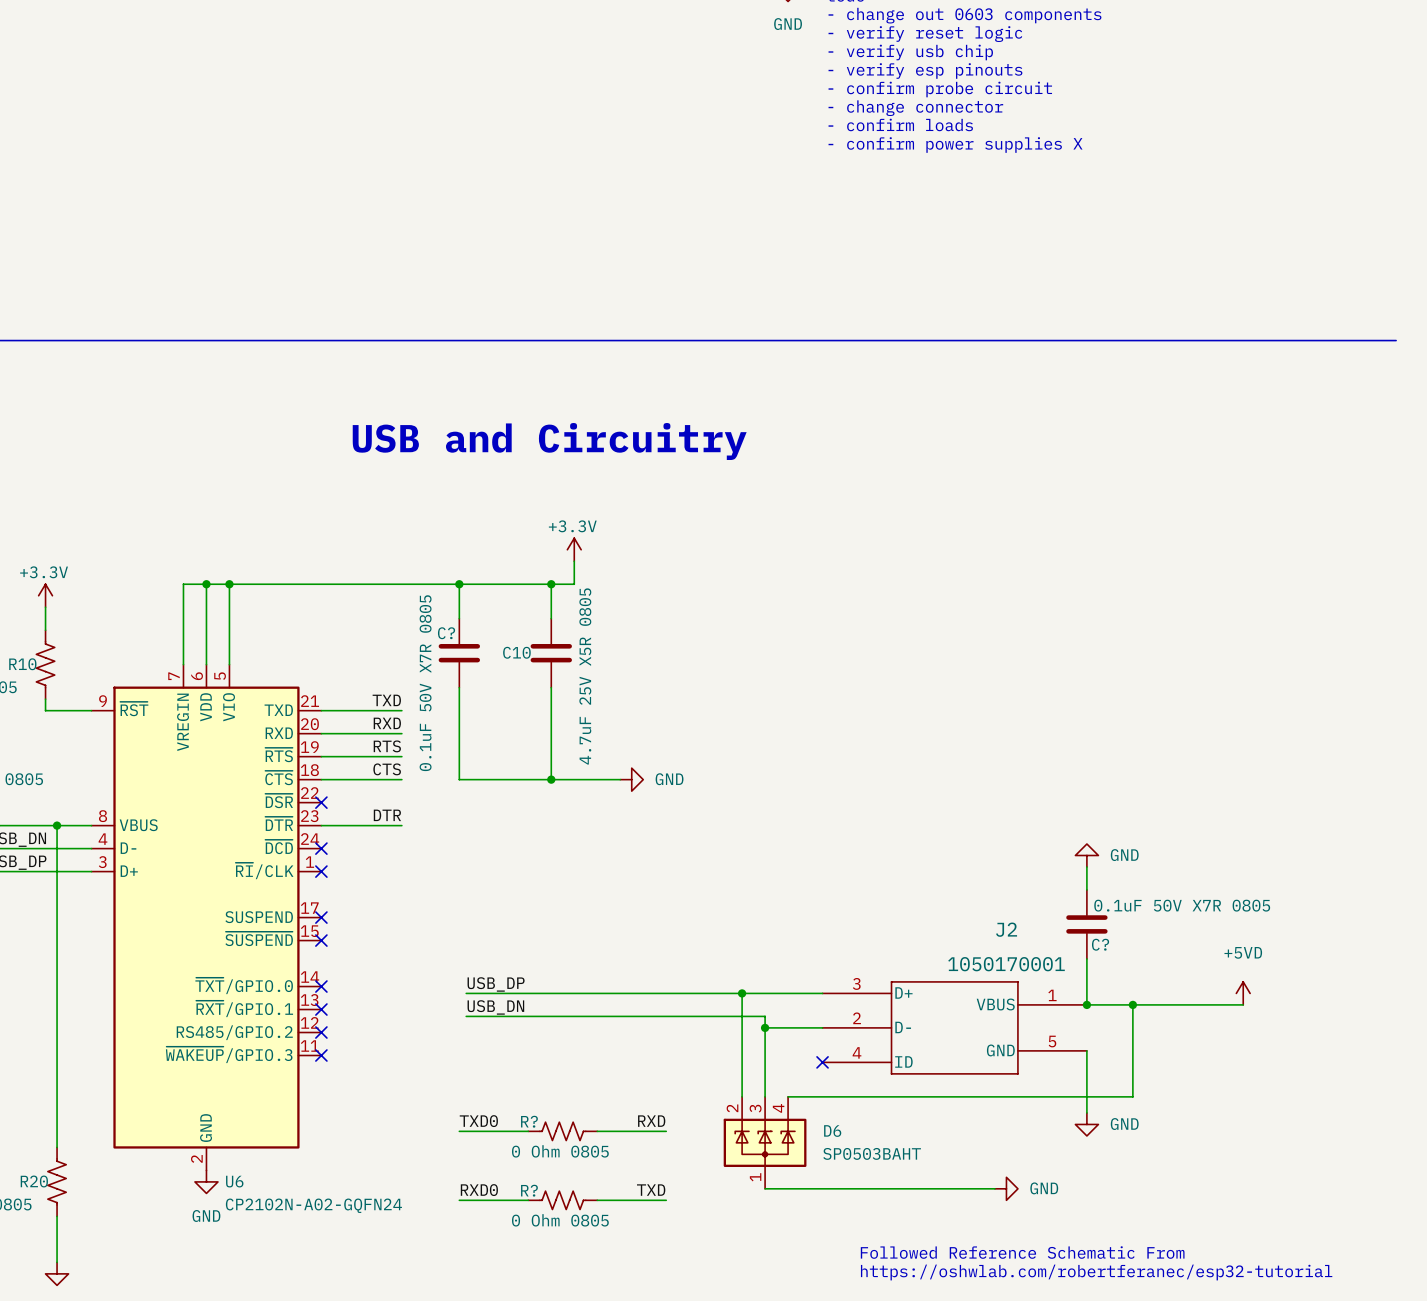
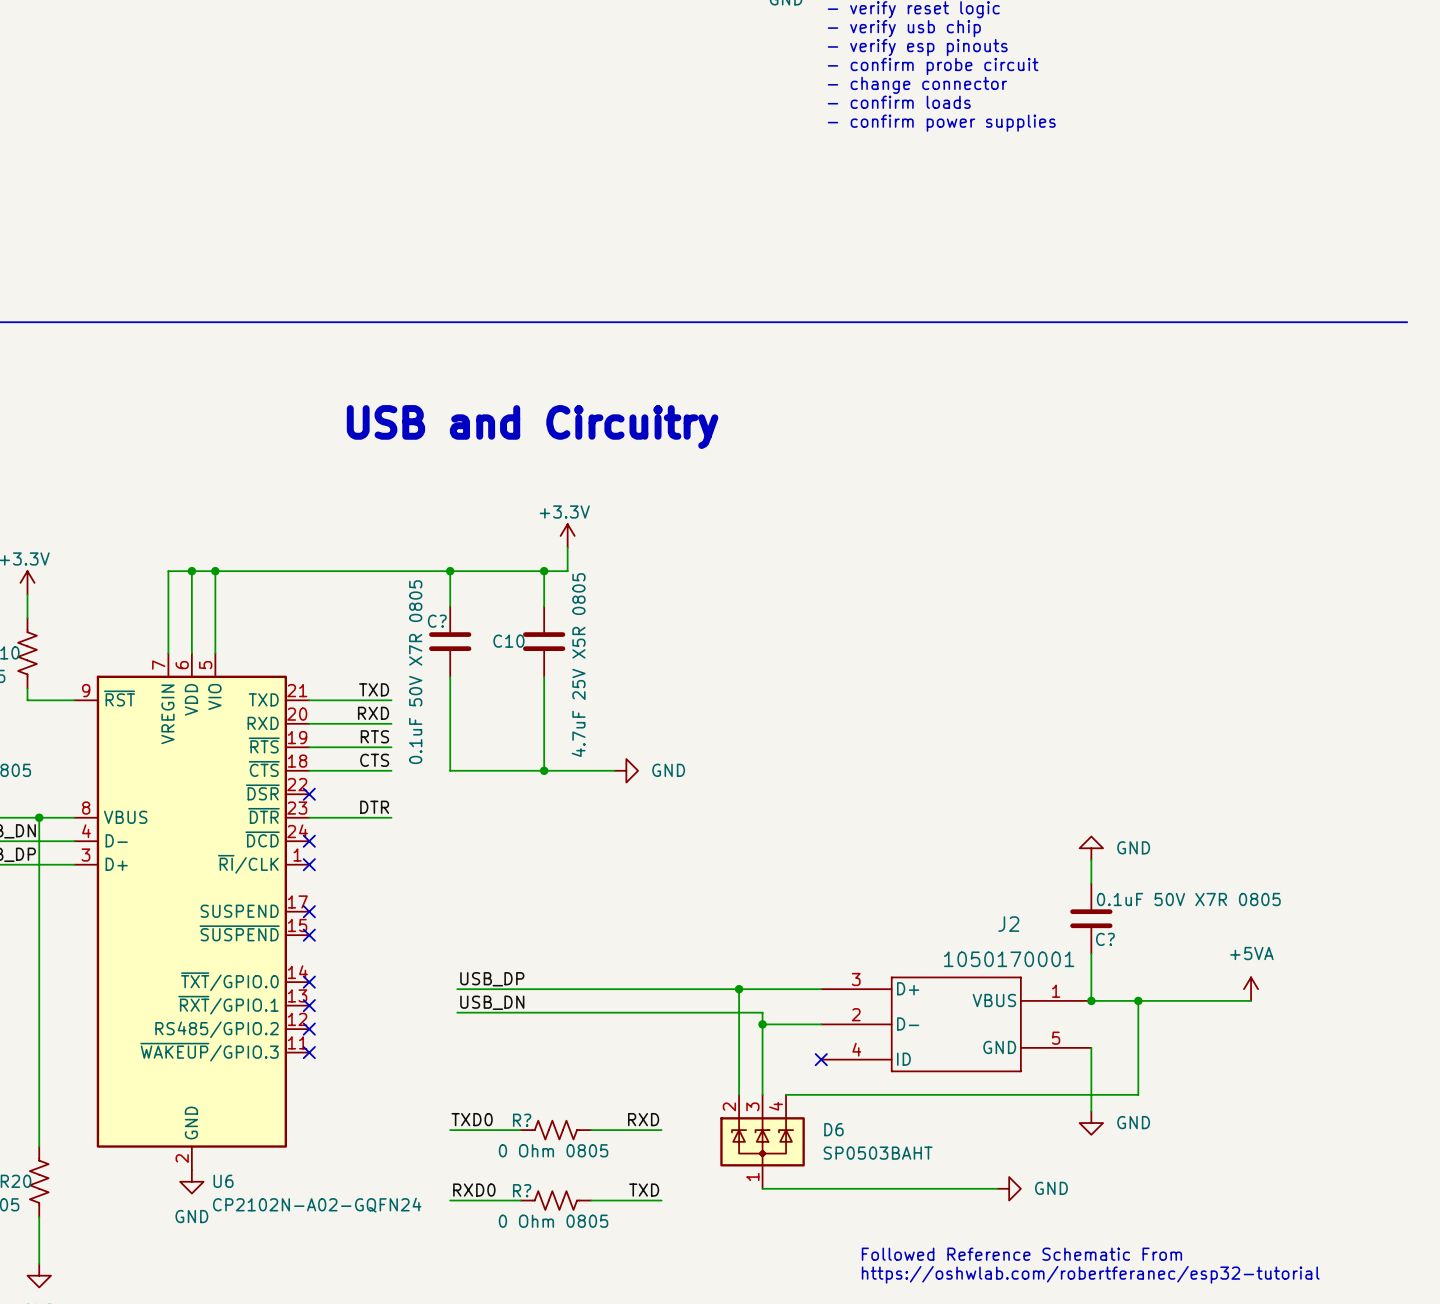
text: - confirm power supplies X (955, 145) -> - confirm power supplies (941, 123)
power symbol: +5VD (1243, 993) -> +5VA (1251, 989)

